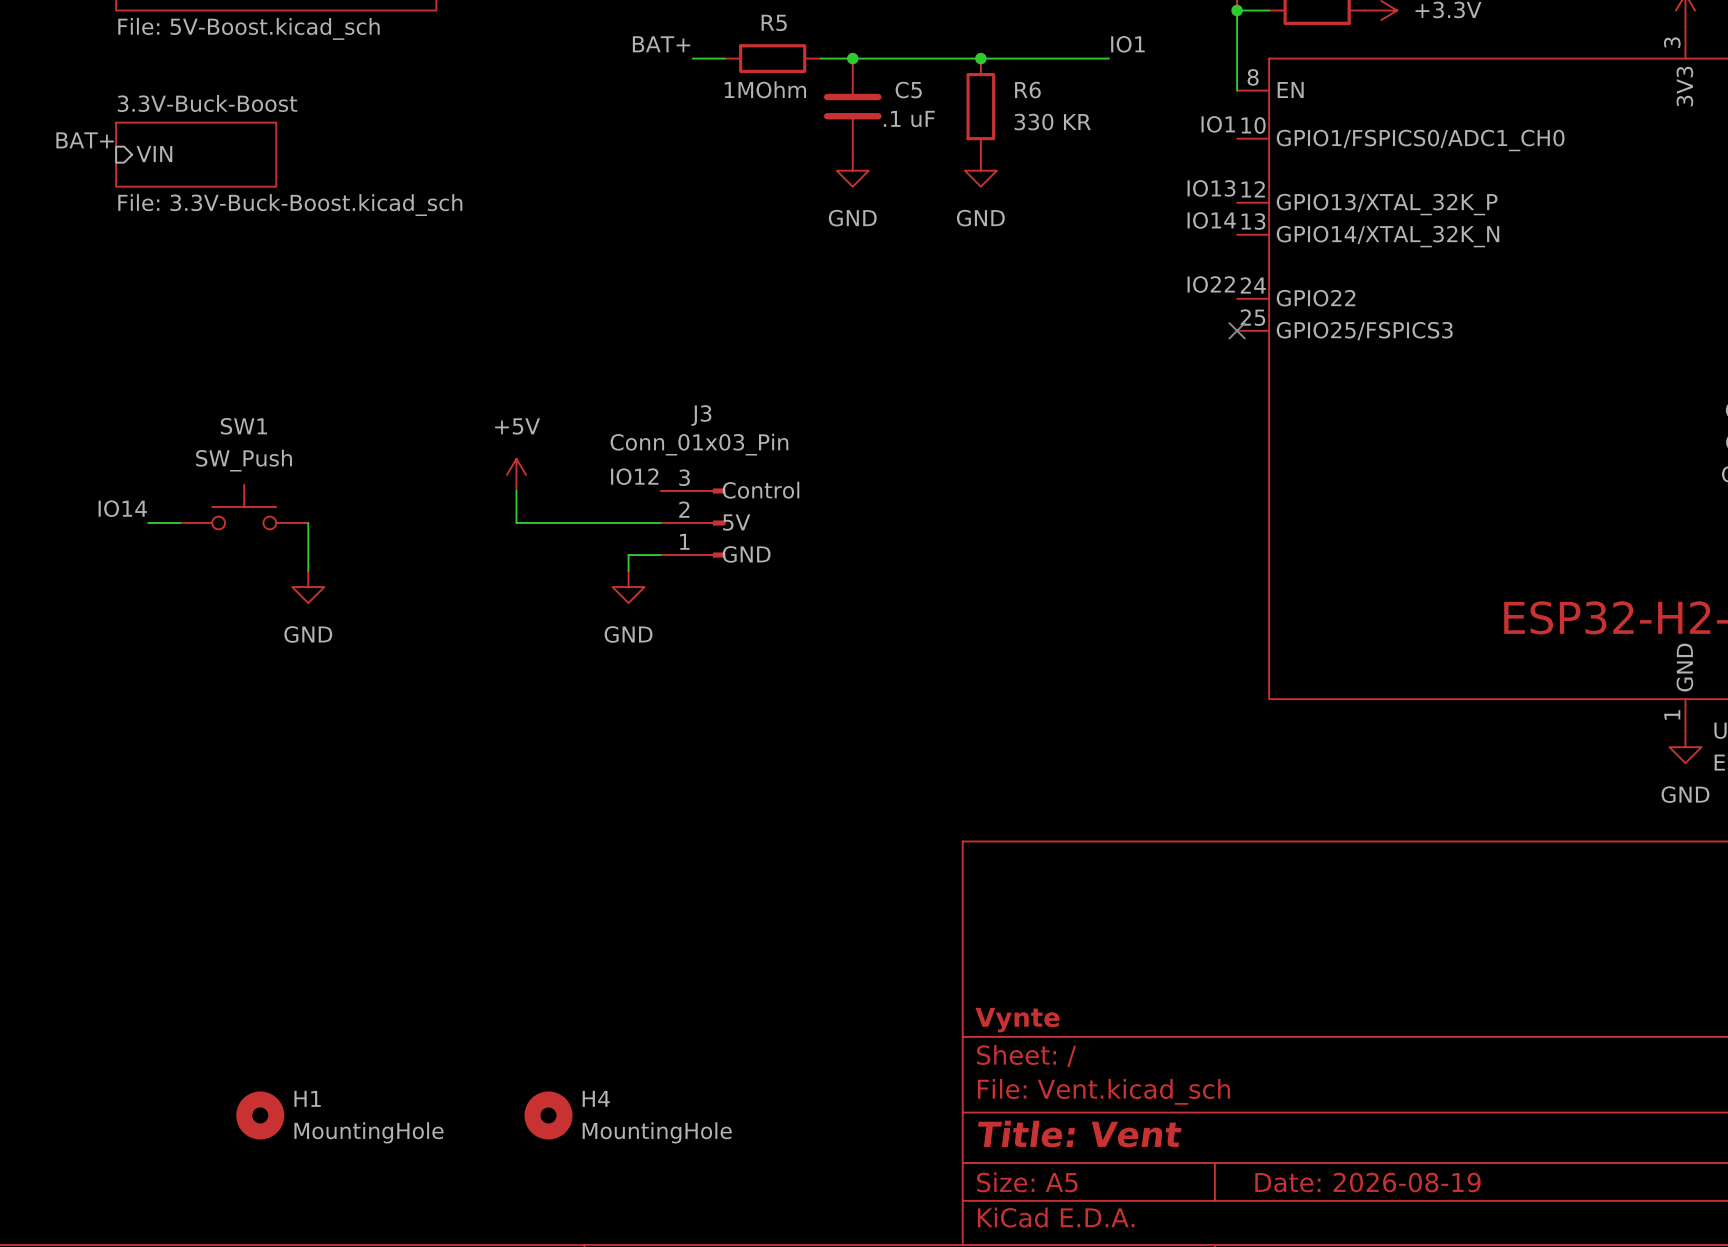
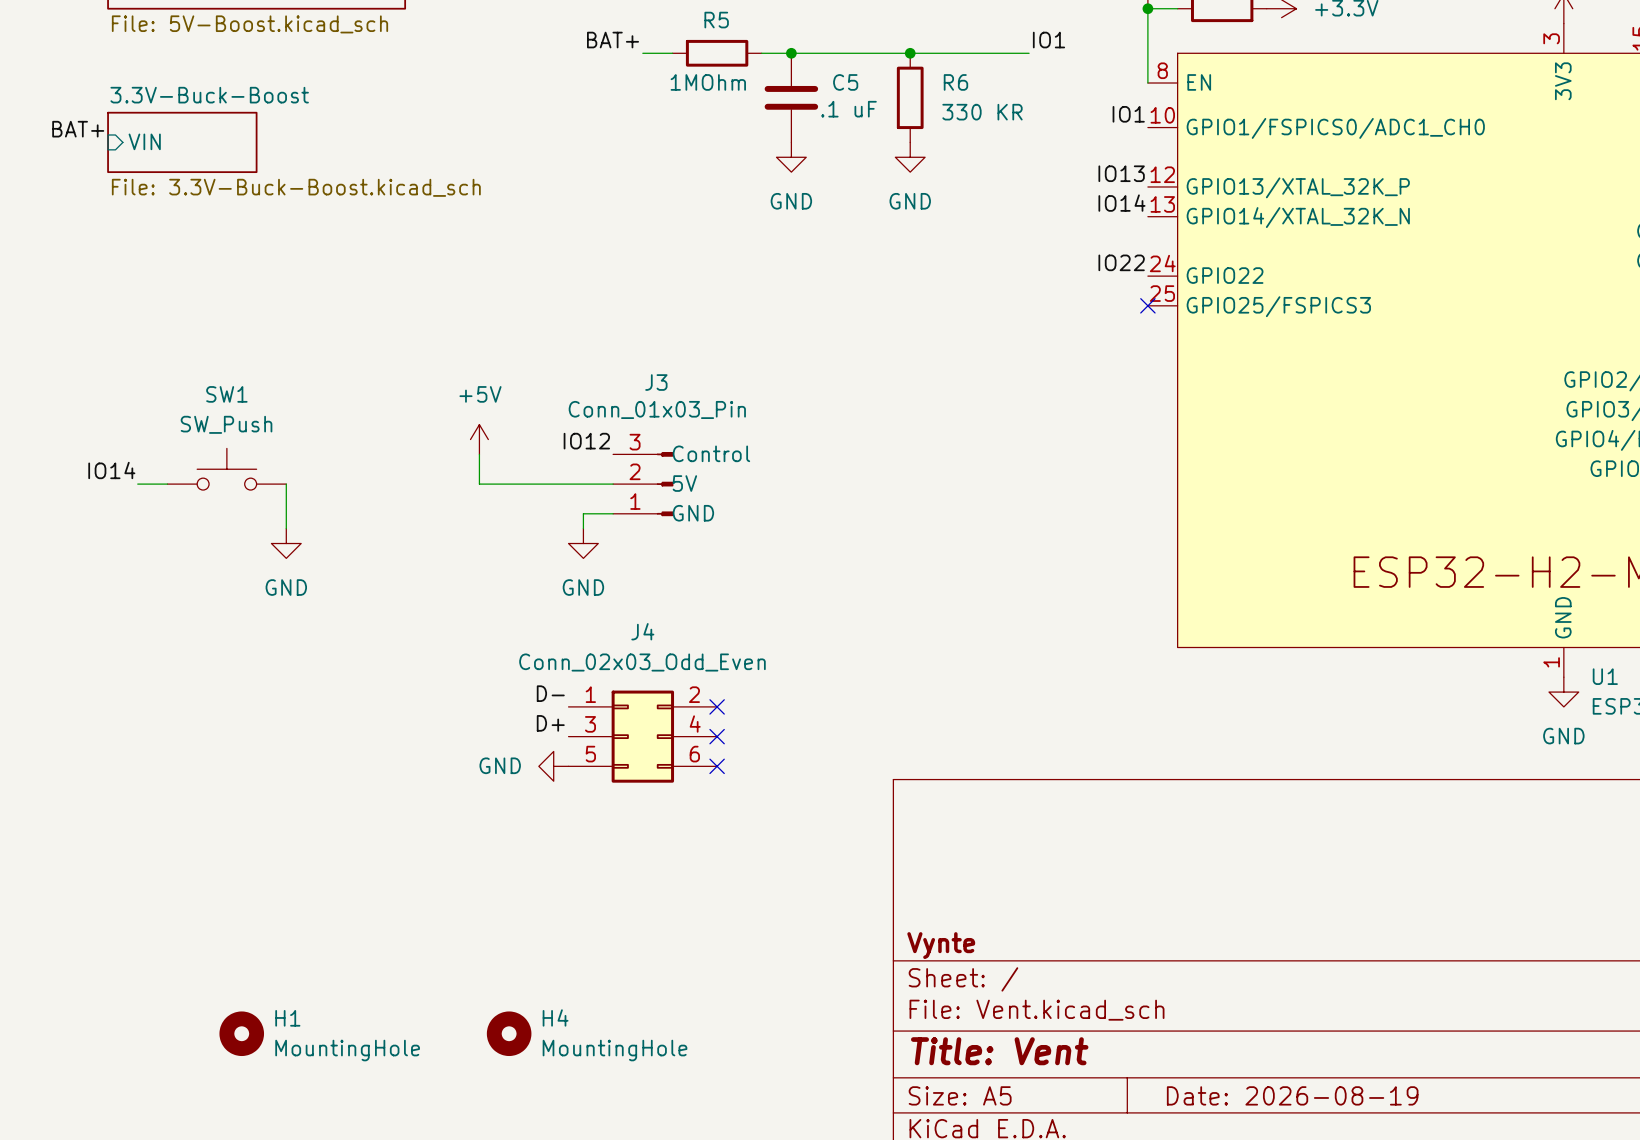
label: none -> D- (550, 693)
no-connect mark: none -> (717, 706)
label: none -> D+ (550, 723)
J4: none -> Conn_02x03_Odd_Even (642, 736)
no-connect mark: none -> (717, 736)
power symbol: none -> GND (553, 766)
no-connect mark: none -> (717, 766)

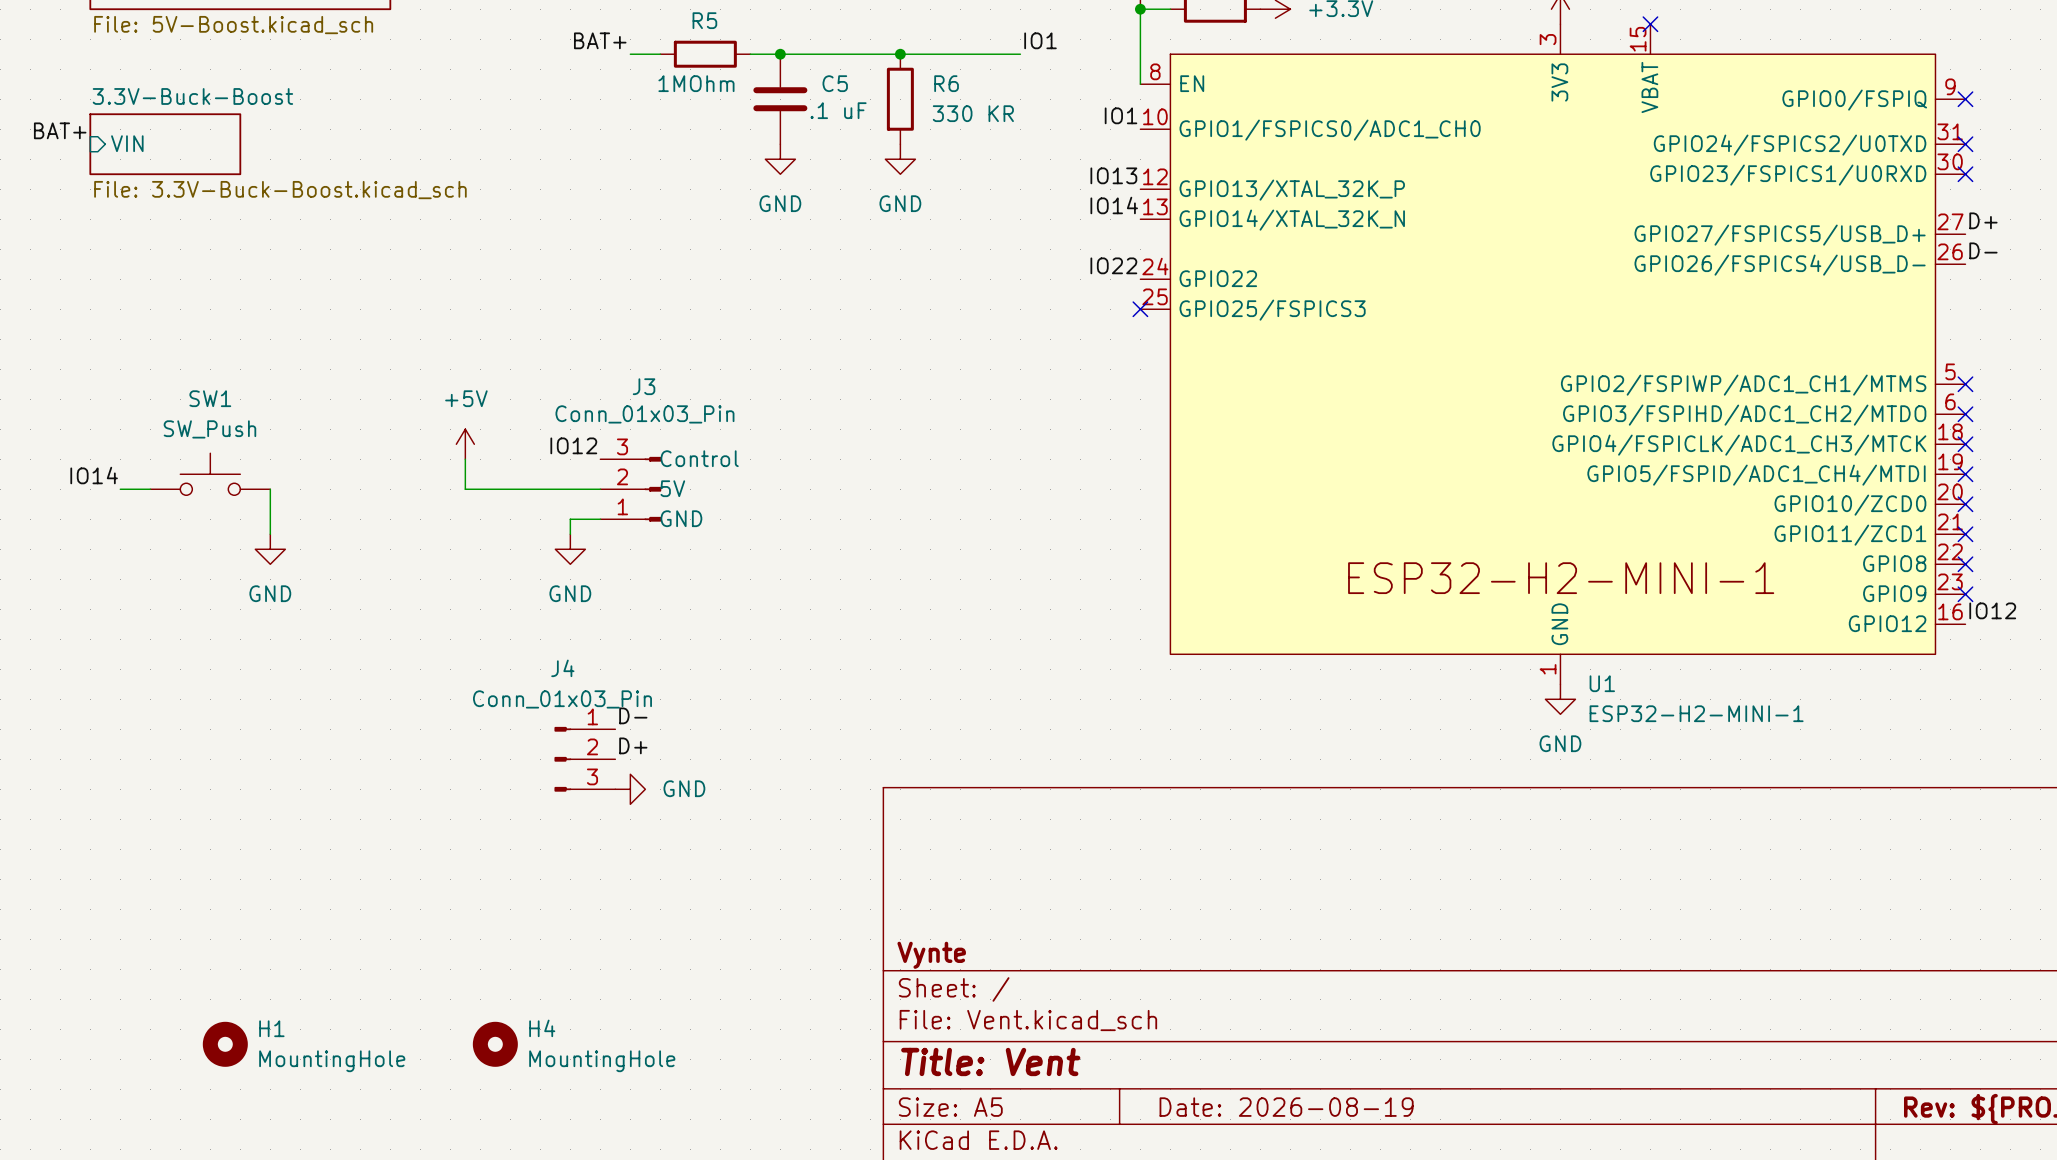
J4 name position: J4 (642, 631) -> J4 (562, 668)
J4 value: Conn_02x03_Odd_Even (642, 662) -> Conn_01x03_Pin (562, 699)
J4 symbol: [568, 690, 718, 783] -> [554, 726, 616, 792]
label position: D- (550, 693) -> D- (633, 715)
no-connect mark: (717, 706) -> none
label position: D+ (550, 723) -> D+ (633, 745)
no-connect mark: (717, 736) -> none
power symbol rotation: 0° (553, 766) -> 180° (630, 789)
power symbol position: GND (553, 766) -> GND (630, 789)
no-connect mark: (717, 766) -> none

